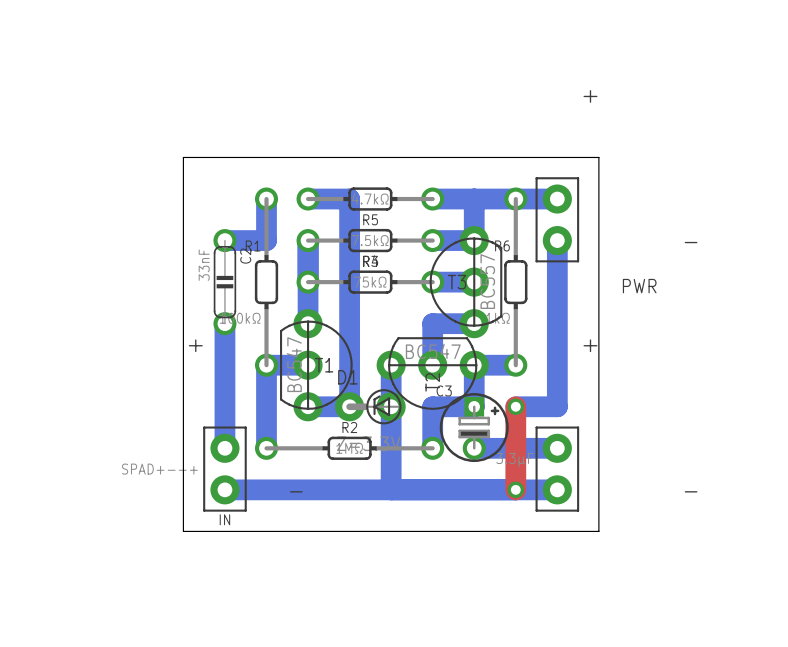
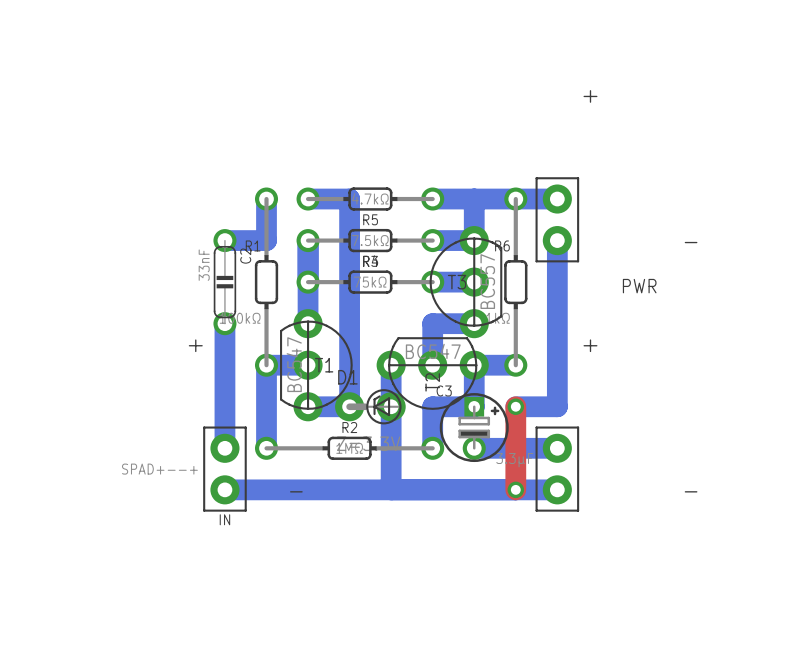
board edge: (183, 157) (598, 157) (598, 531) (183, 531) (183, 157) -> none

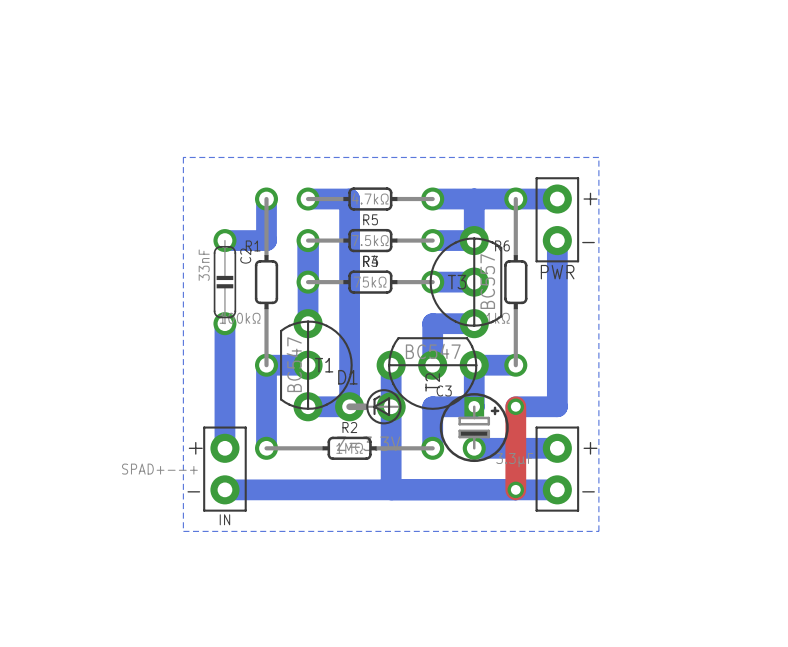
bottom zone outline: none -> (183, 157) (183, 531) (598, 531) (598, 157) (183, 157)
part footprint: [535, 177, 580, 263] -> [535, 177, 580, 263]
IN footprint: [203, 426, 247, 512] -> [203, 426, 247, 512]
part footprint: [535, 426, 580, 512] -> [535, 426, 580, 512]

